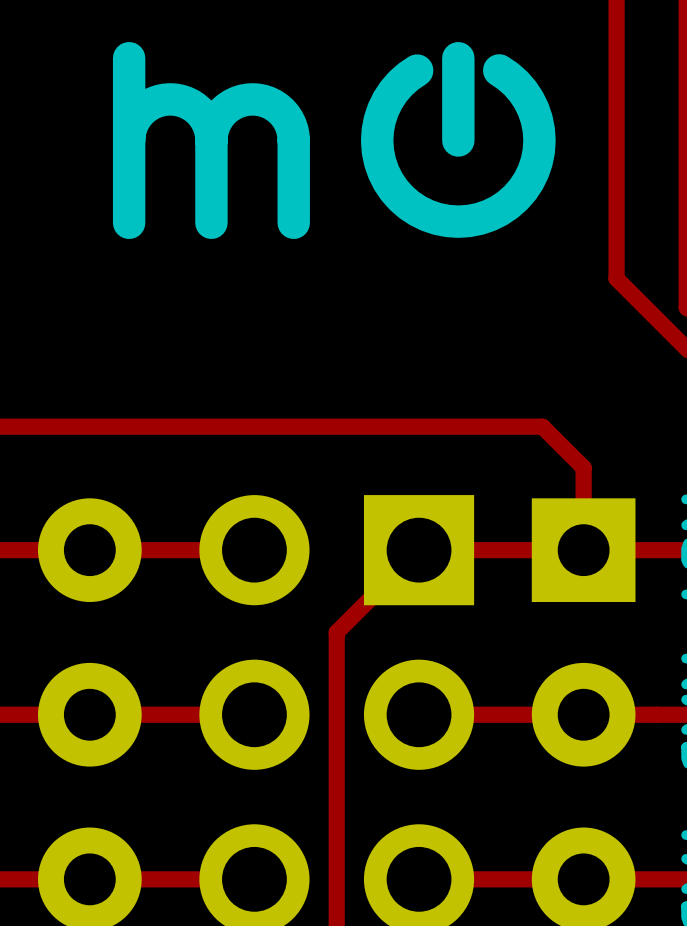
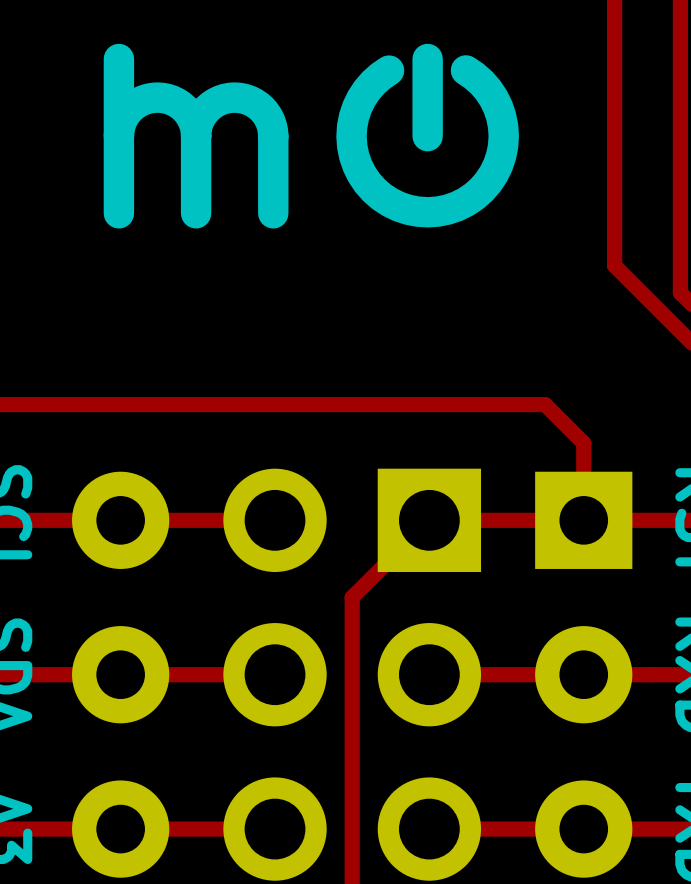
drawing position: (334, 140) -> (311, 136)

